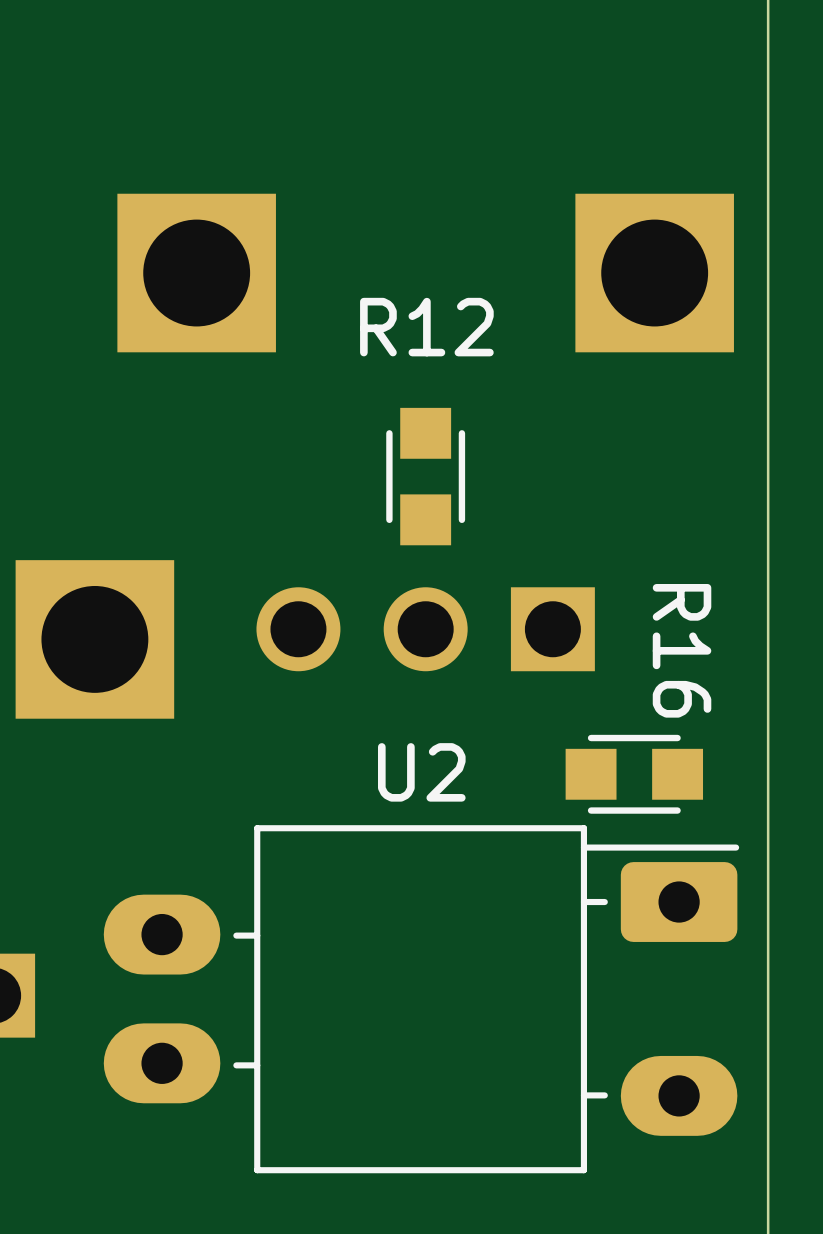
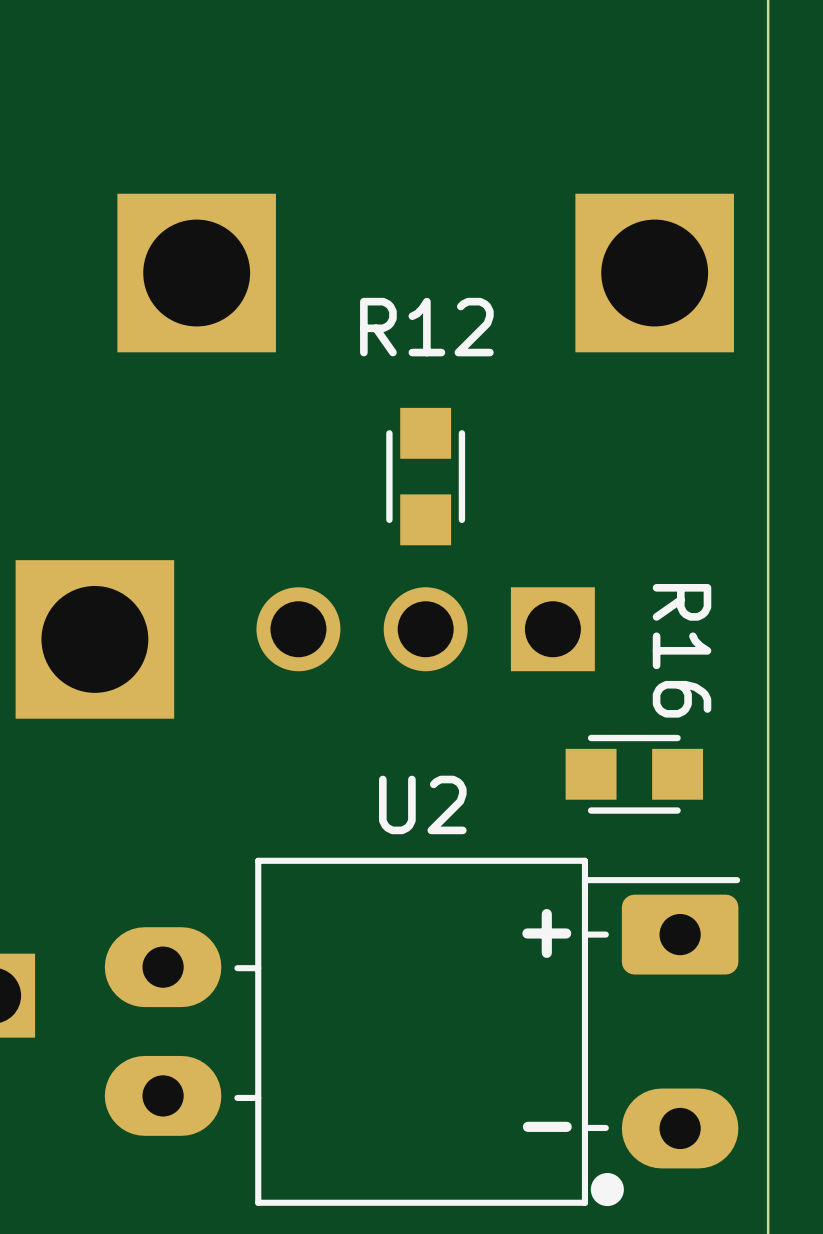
U2 footprint: [103, 825, 740, 1174] -> [104, 857, 741, 1207]

